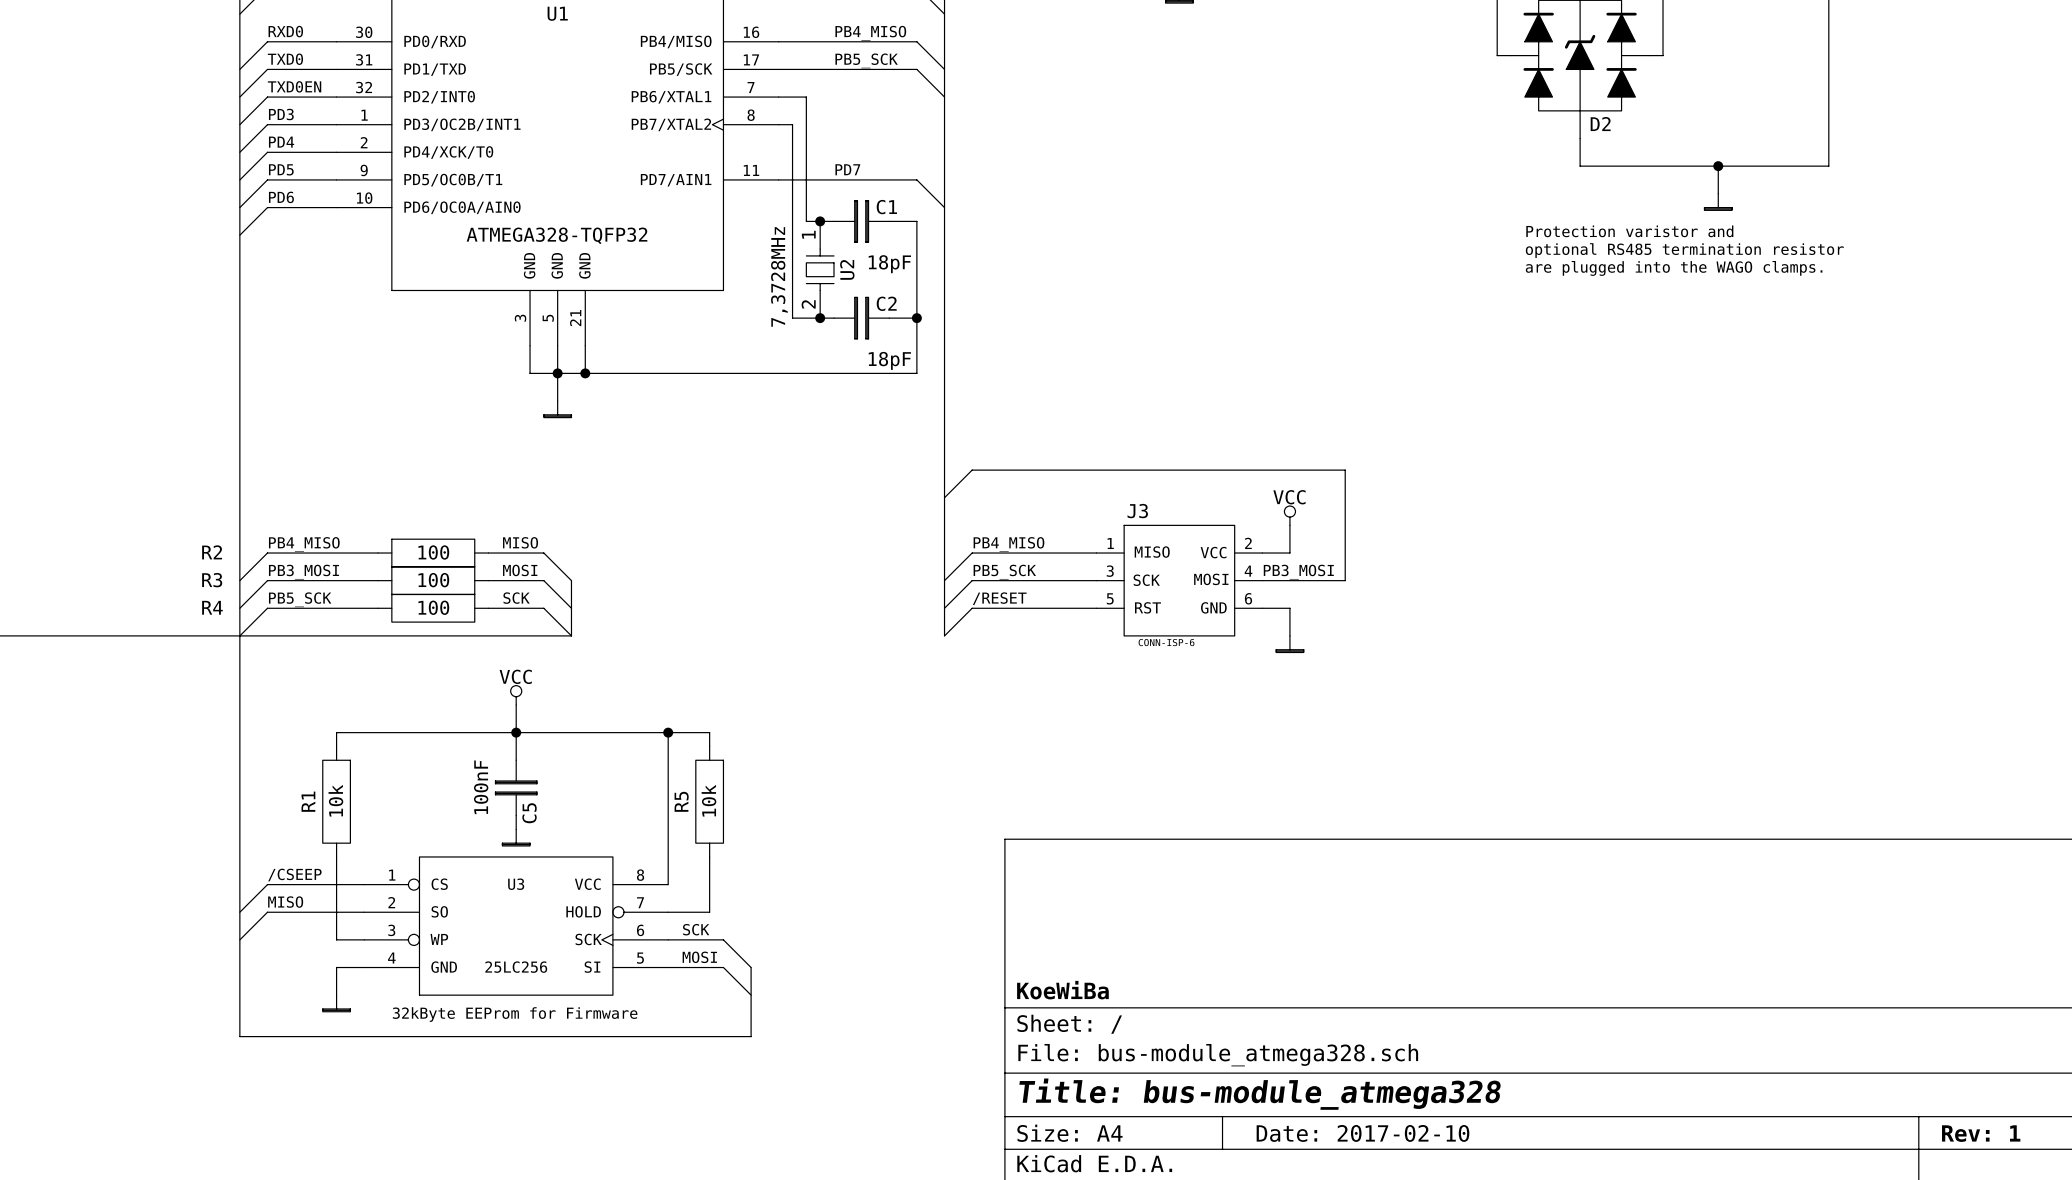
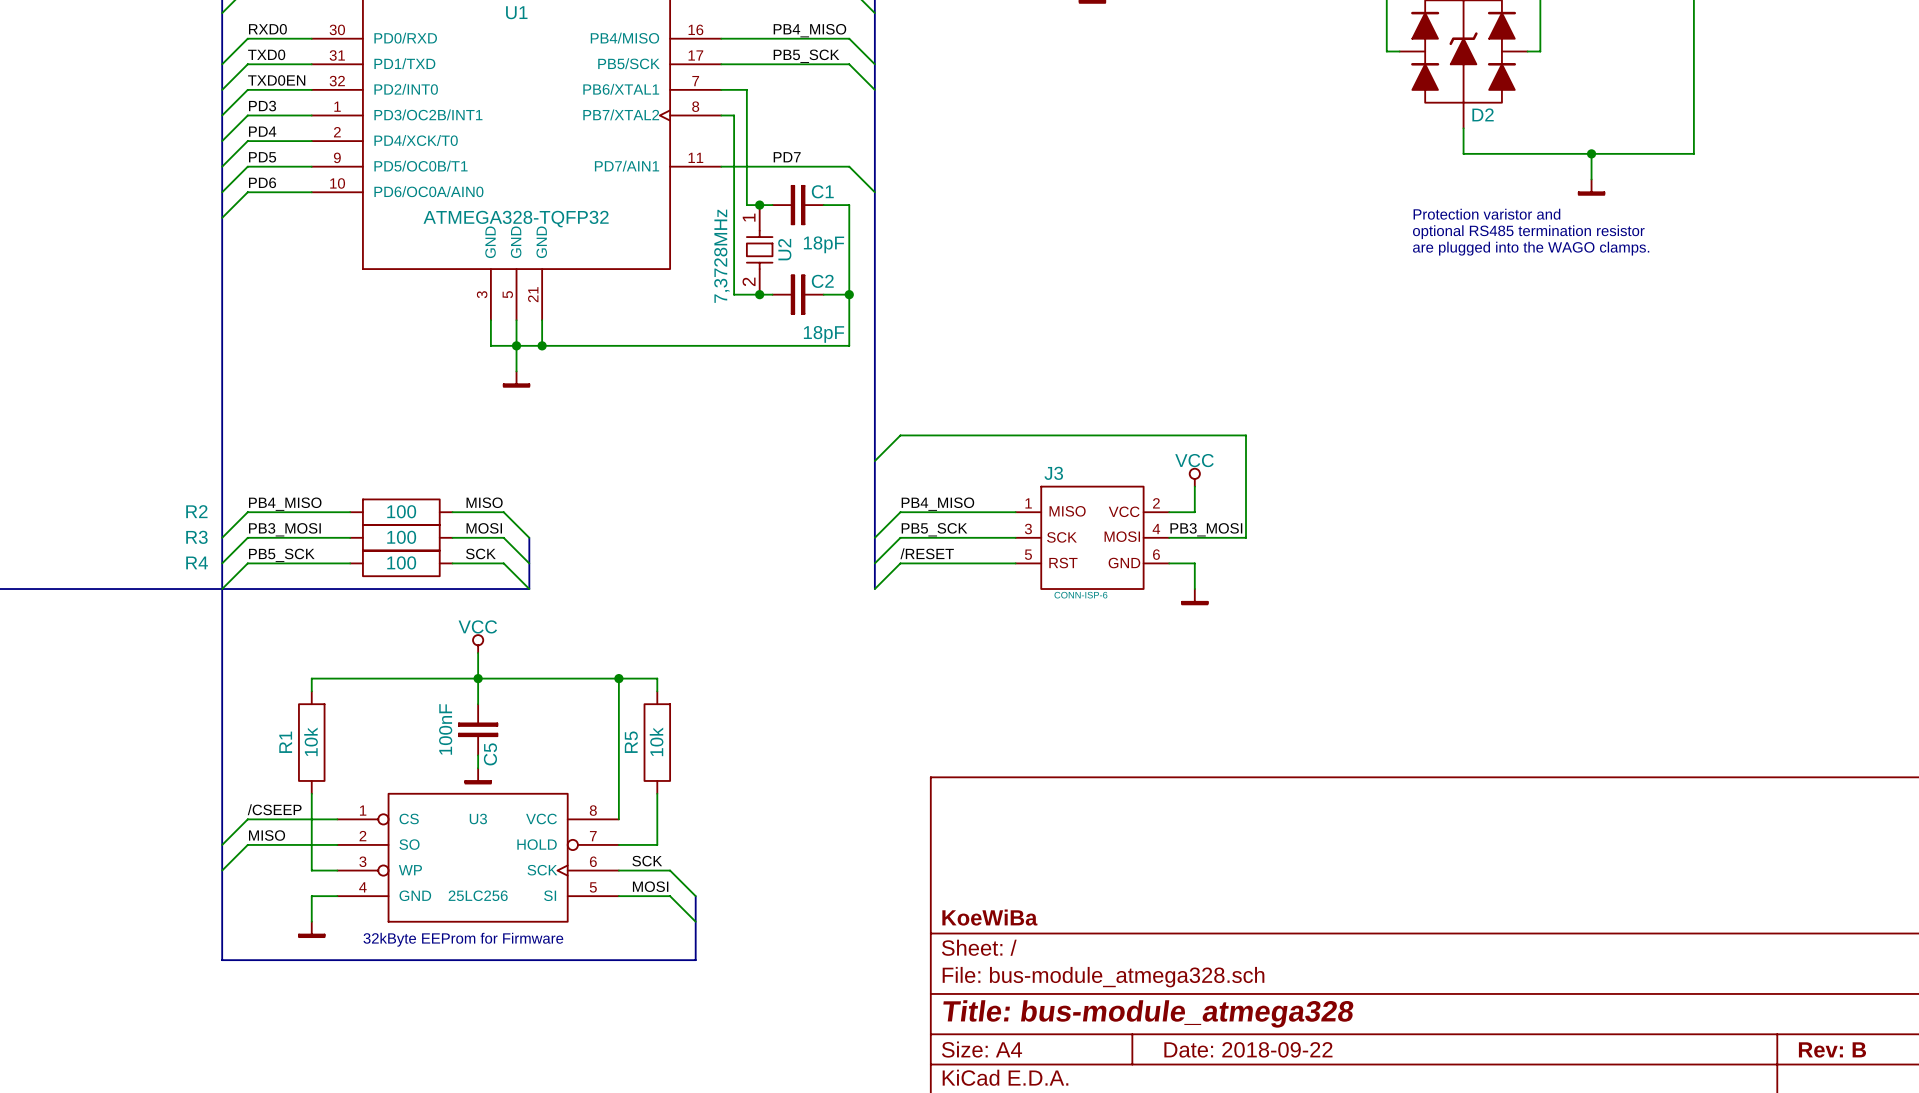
title block: Date: 2017-02-10 (1362, 1133) -> Date: 2018-09-22 (1248, 1049)
title block: Rev: 1 (1981, 1133) -> Rev: B (1832, 1049)

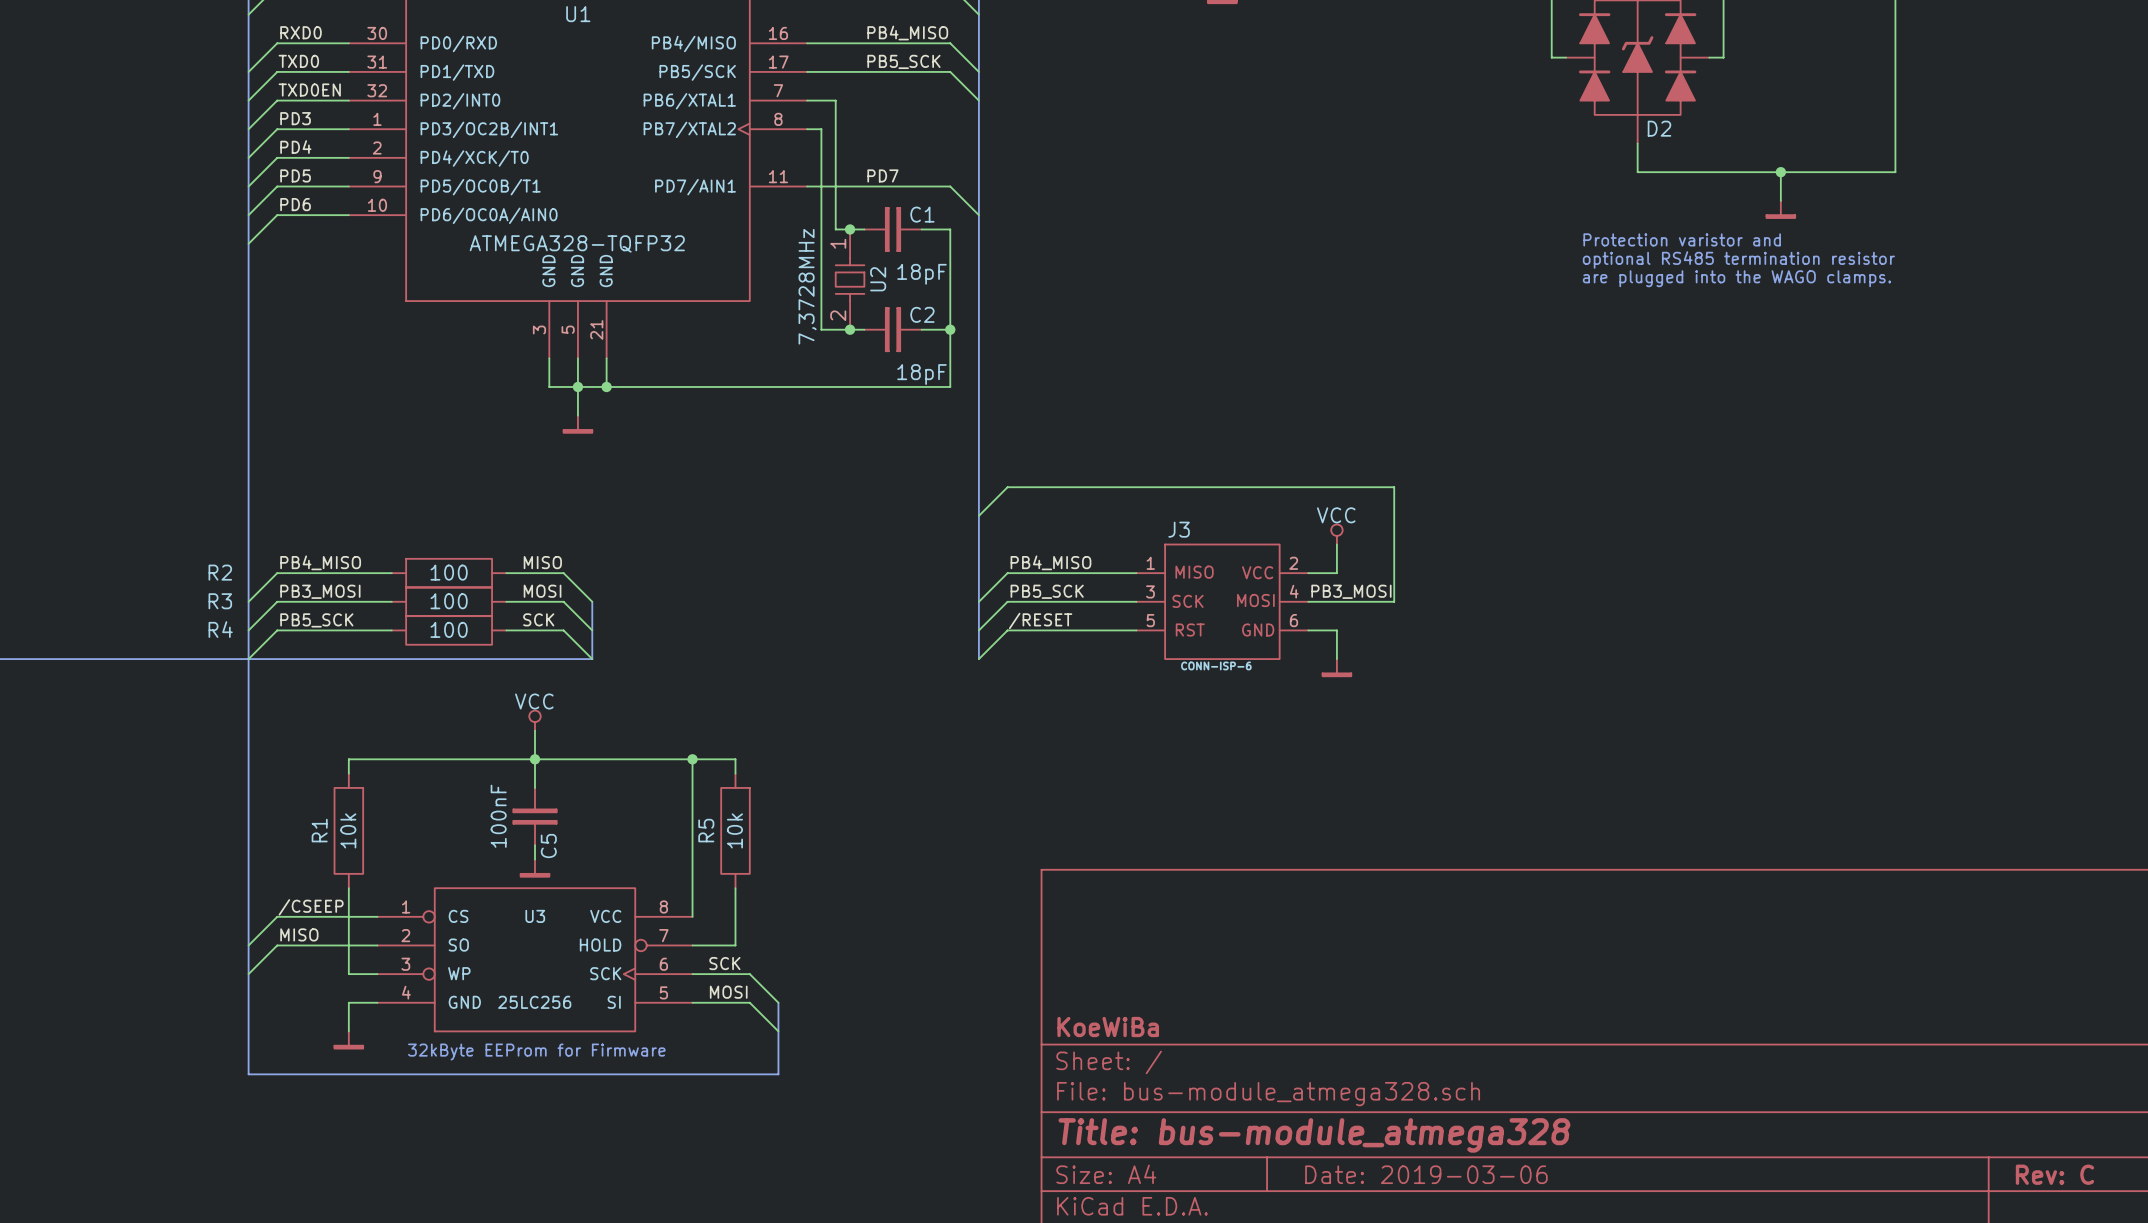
title block: Date: 2018-09-22 (1248, 1049) -> Date: 2019-03-06 (1426, 1174)
title block: Rev: B (1832, 1049) -> Rev: C (2054, 1174)

